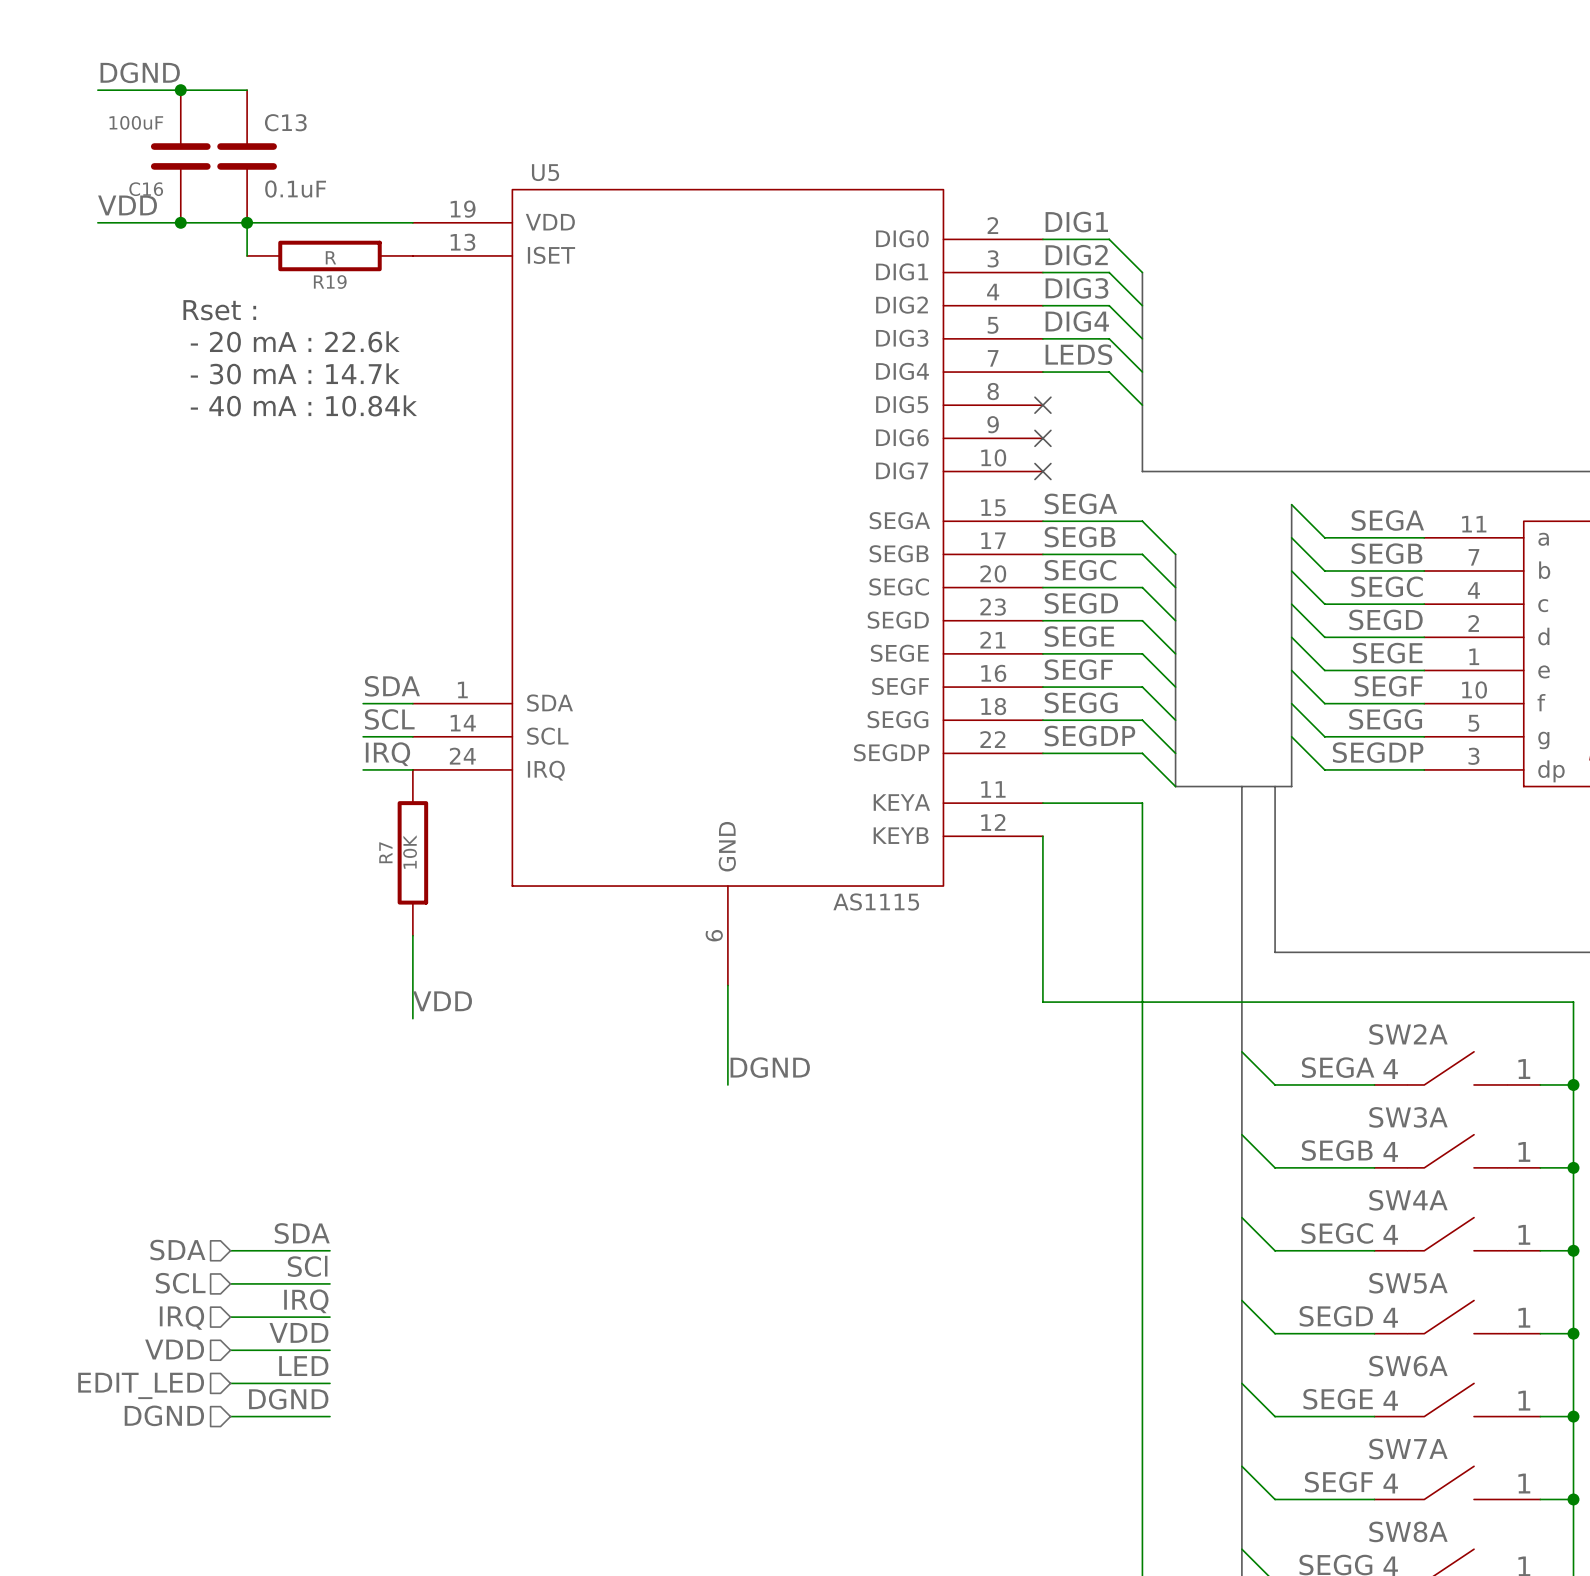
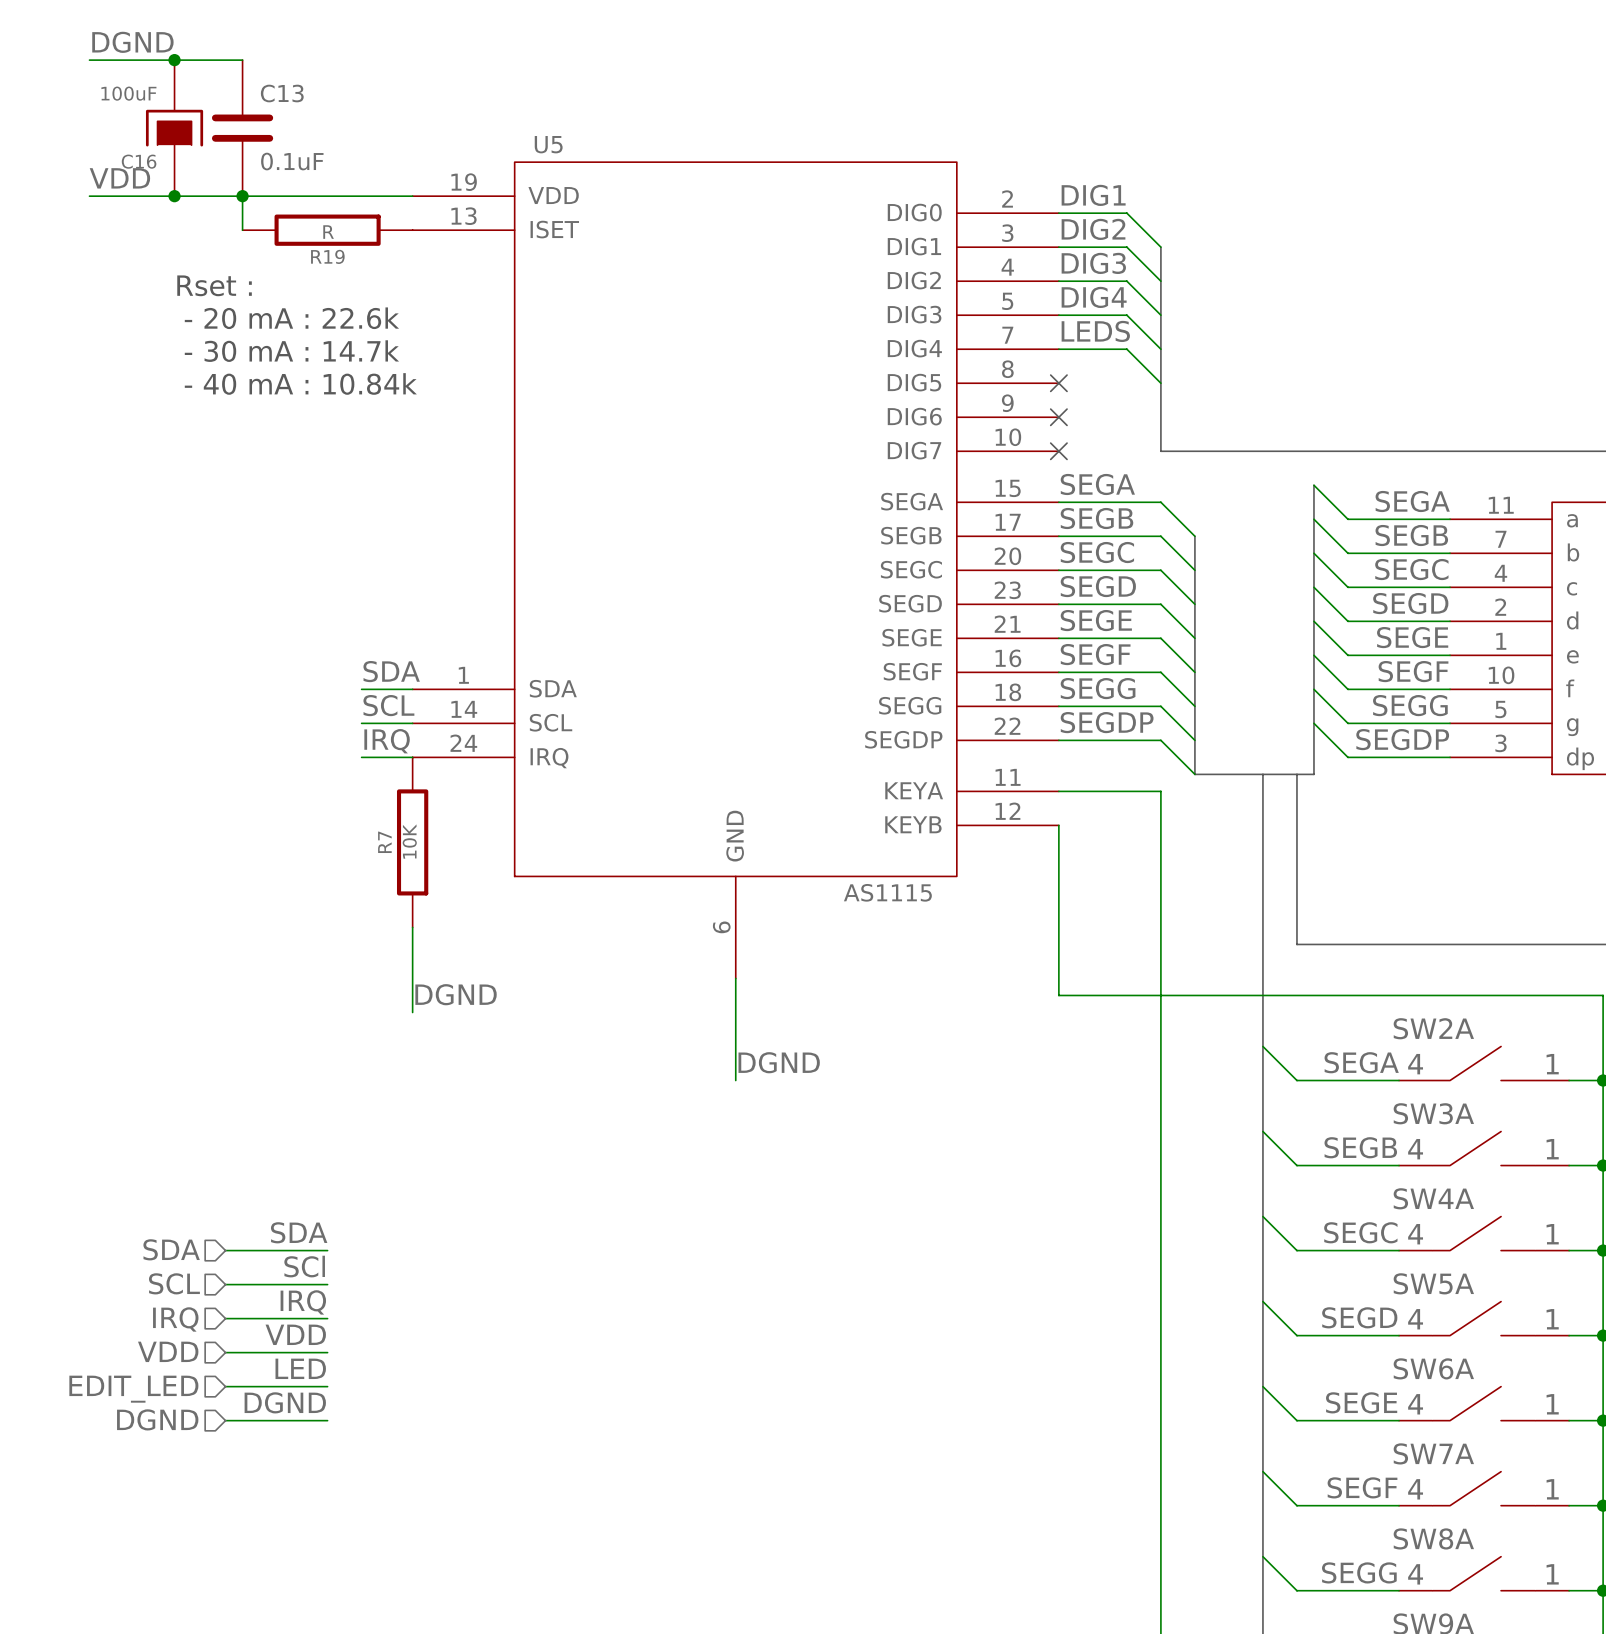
C16 symbol: [150, 90, 211, 223] -> [145, 60, 204, 197]
label: VDD (442, 1001) -> DGND (456, 994)

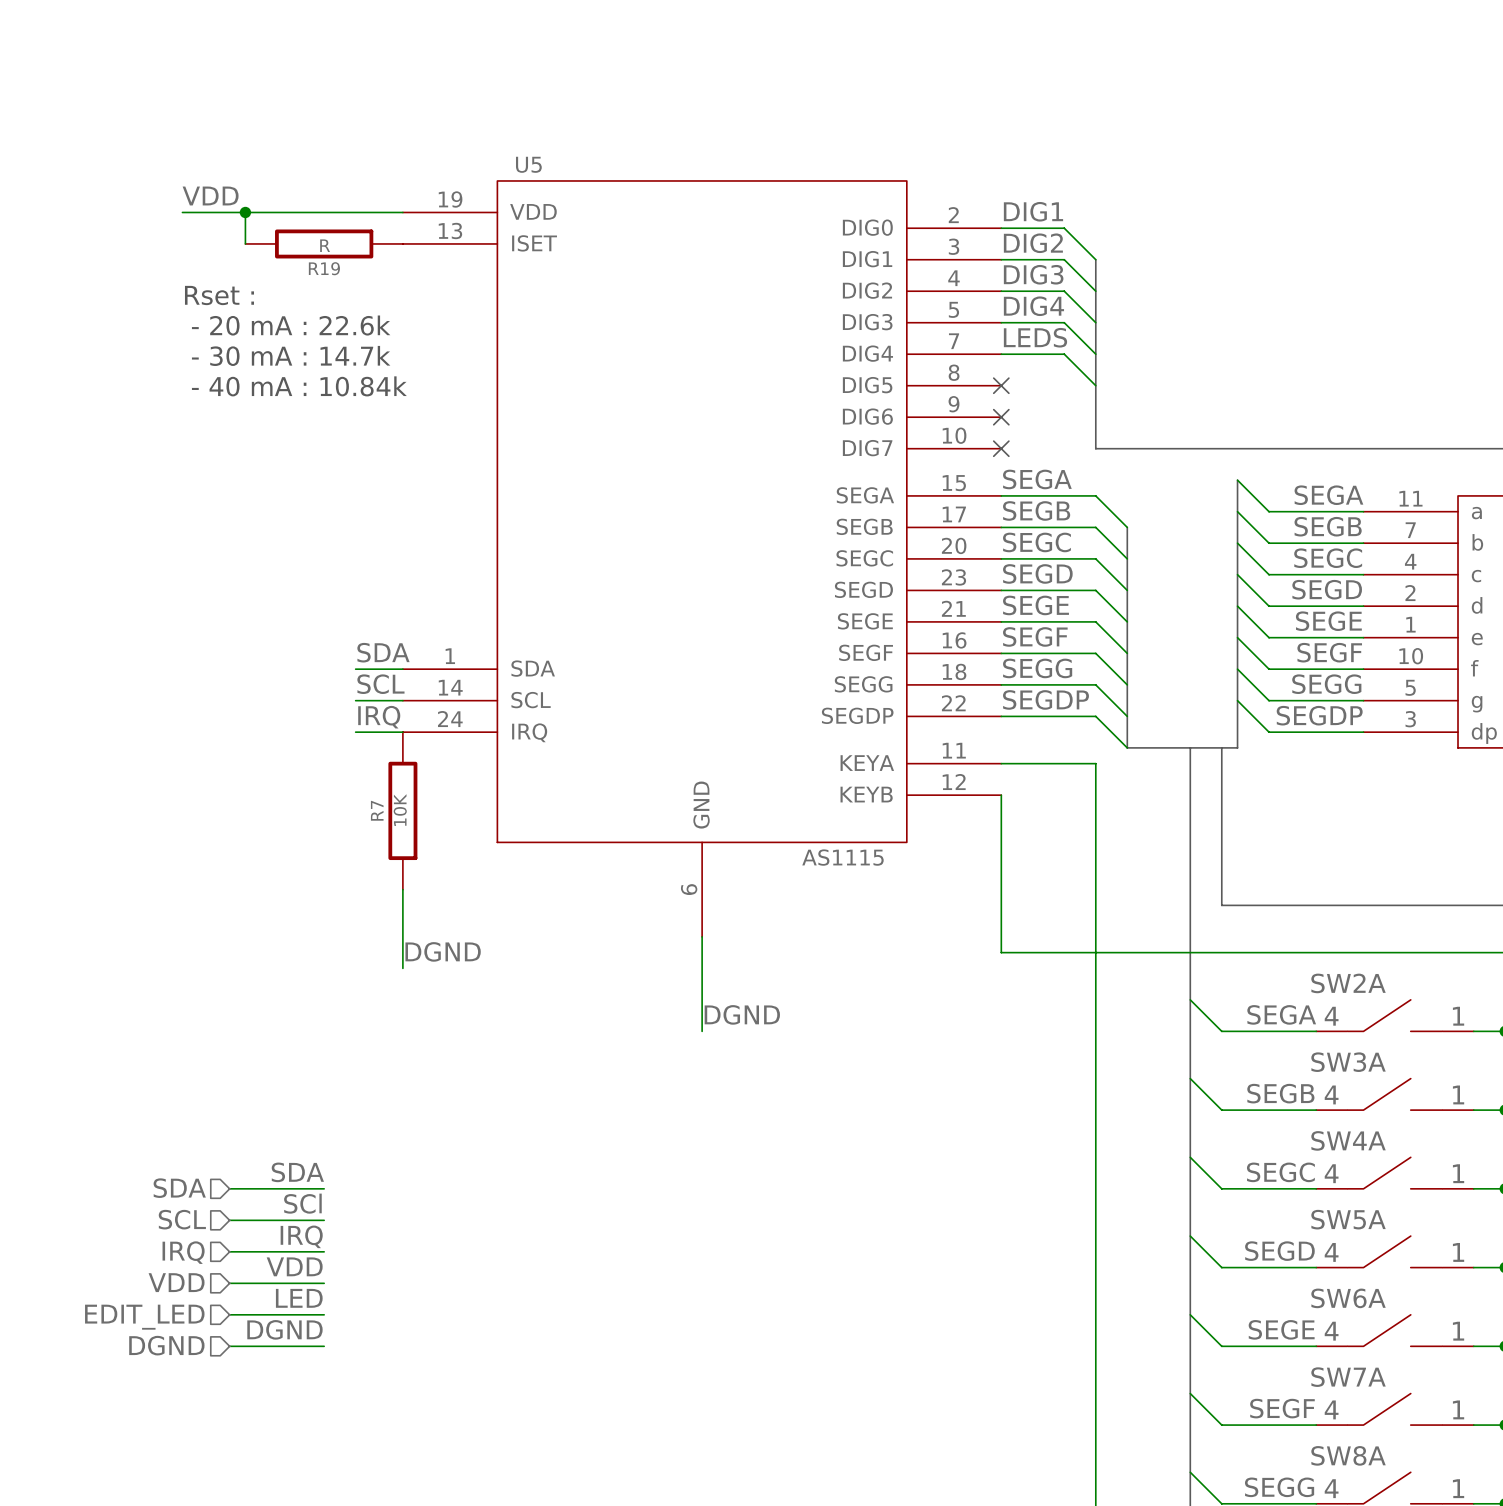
label: DGND (132, 42) -> none
wire: (89, 60) (242, 60) -> none
junction: (174, 60) -> none
C16: 100uF (174, 128) -> none
C13: 0.1uF (242, 128) -> none
label position: VDD (119, 178) -> VDD (210, 195)
wire: (89, 196) (174, 196) -> none
junction: (174, 196) -> none

